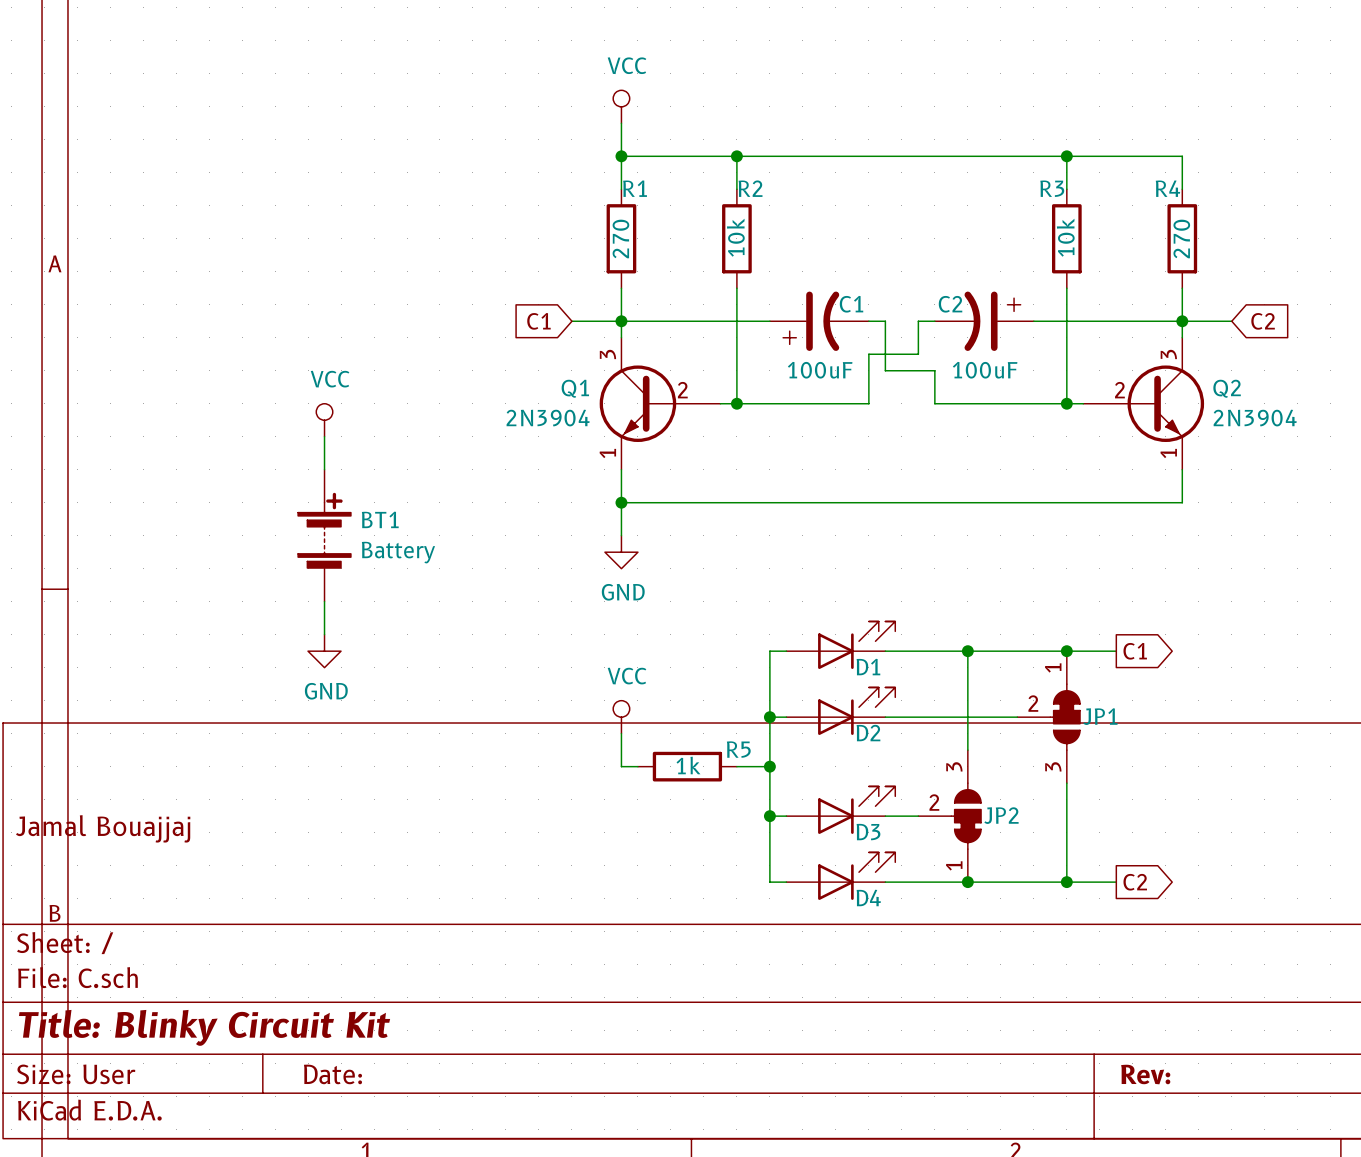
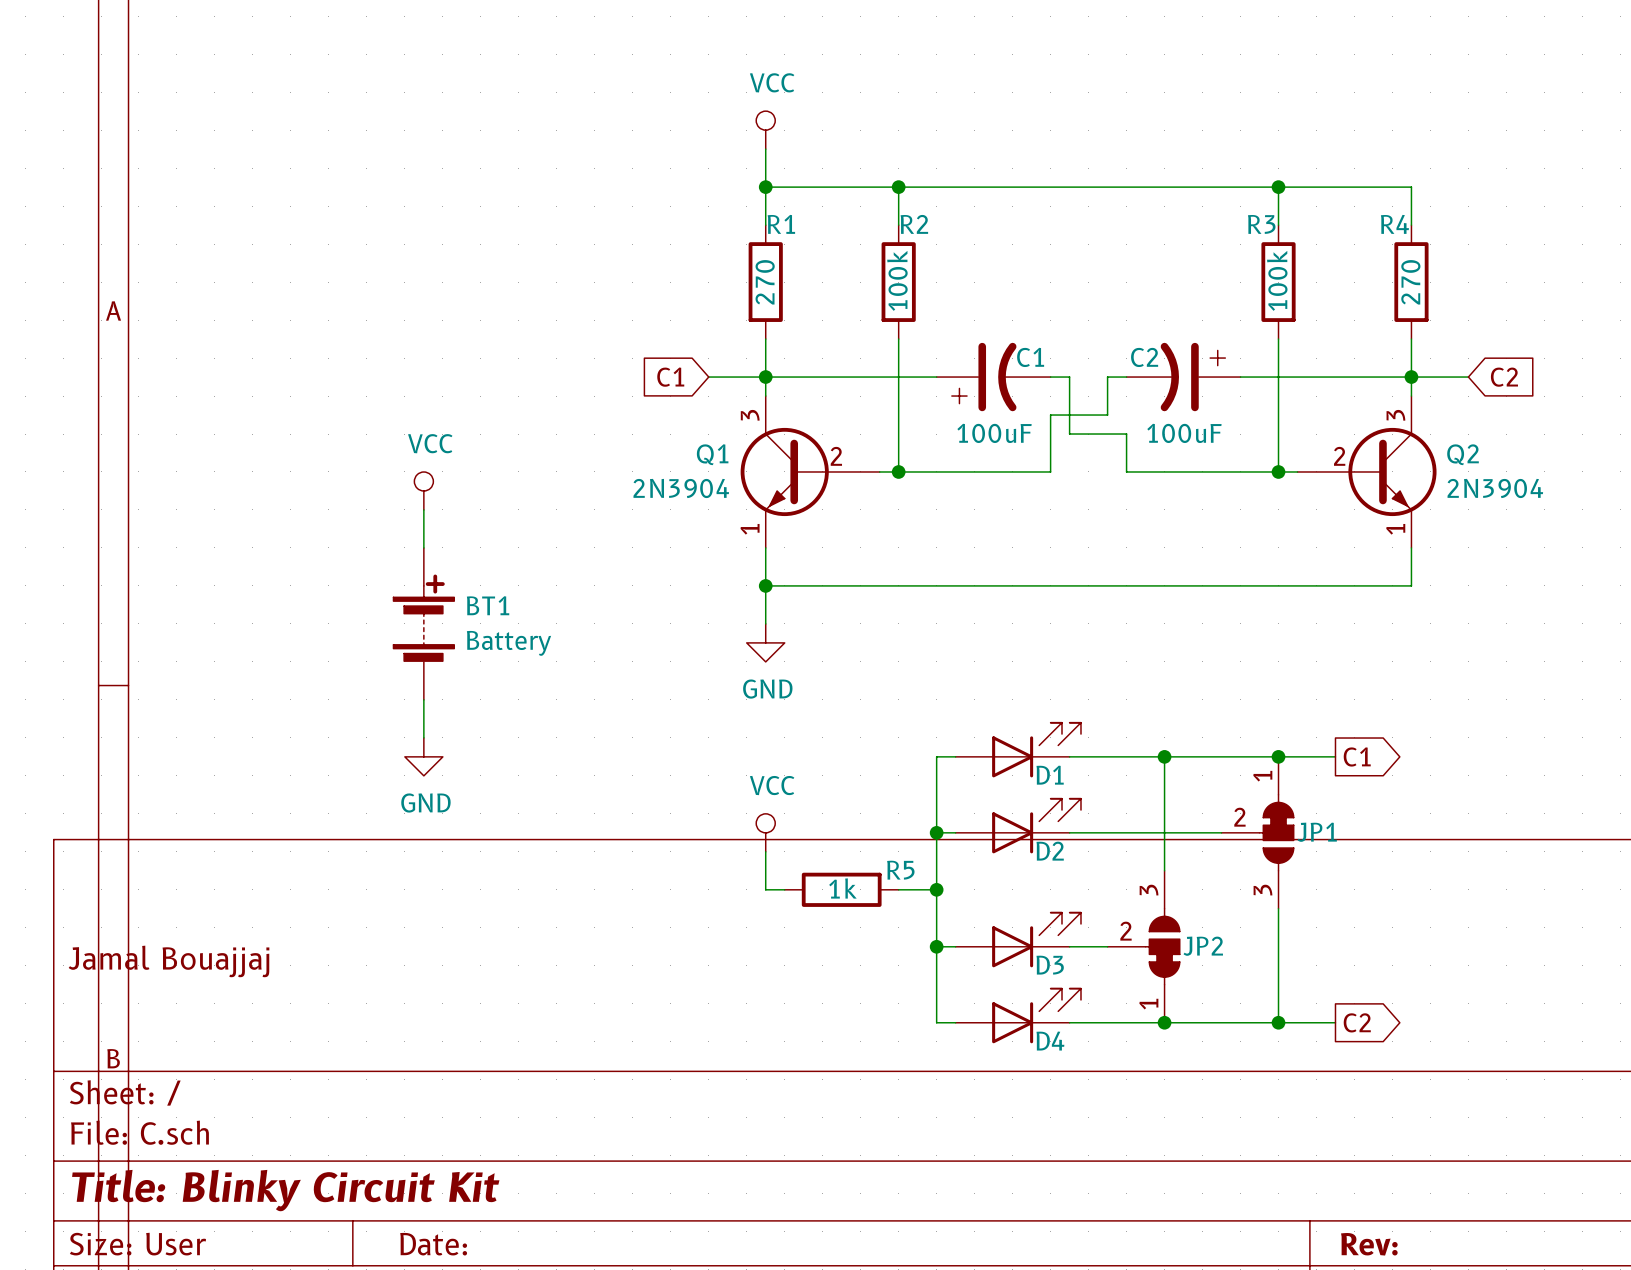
R2 value: 10k (735, 237) -> 100k (897, 280)
R3 value: 10k (1065, 237) -> 100k (1277, 280)

